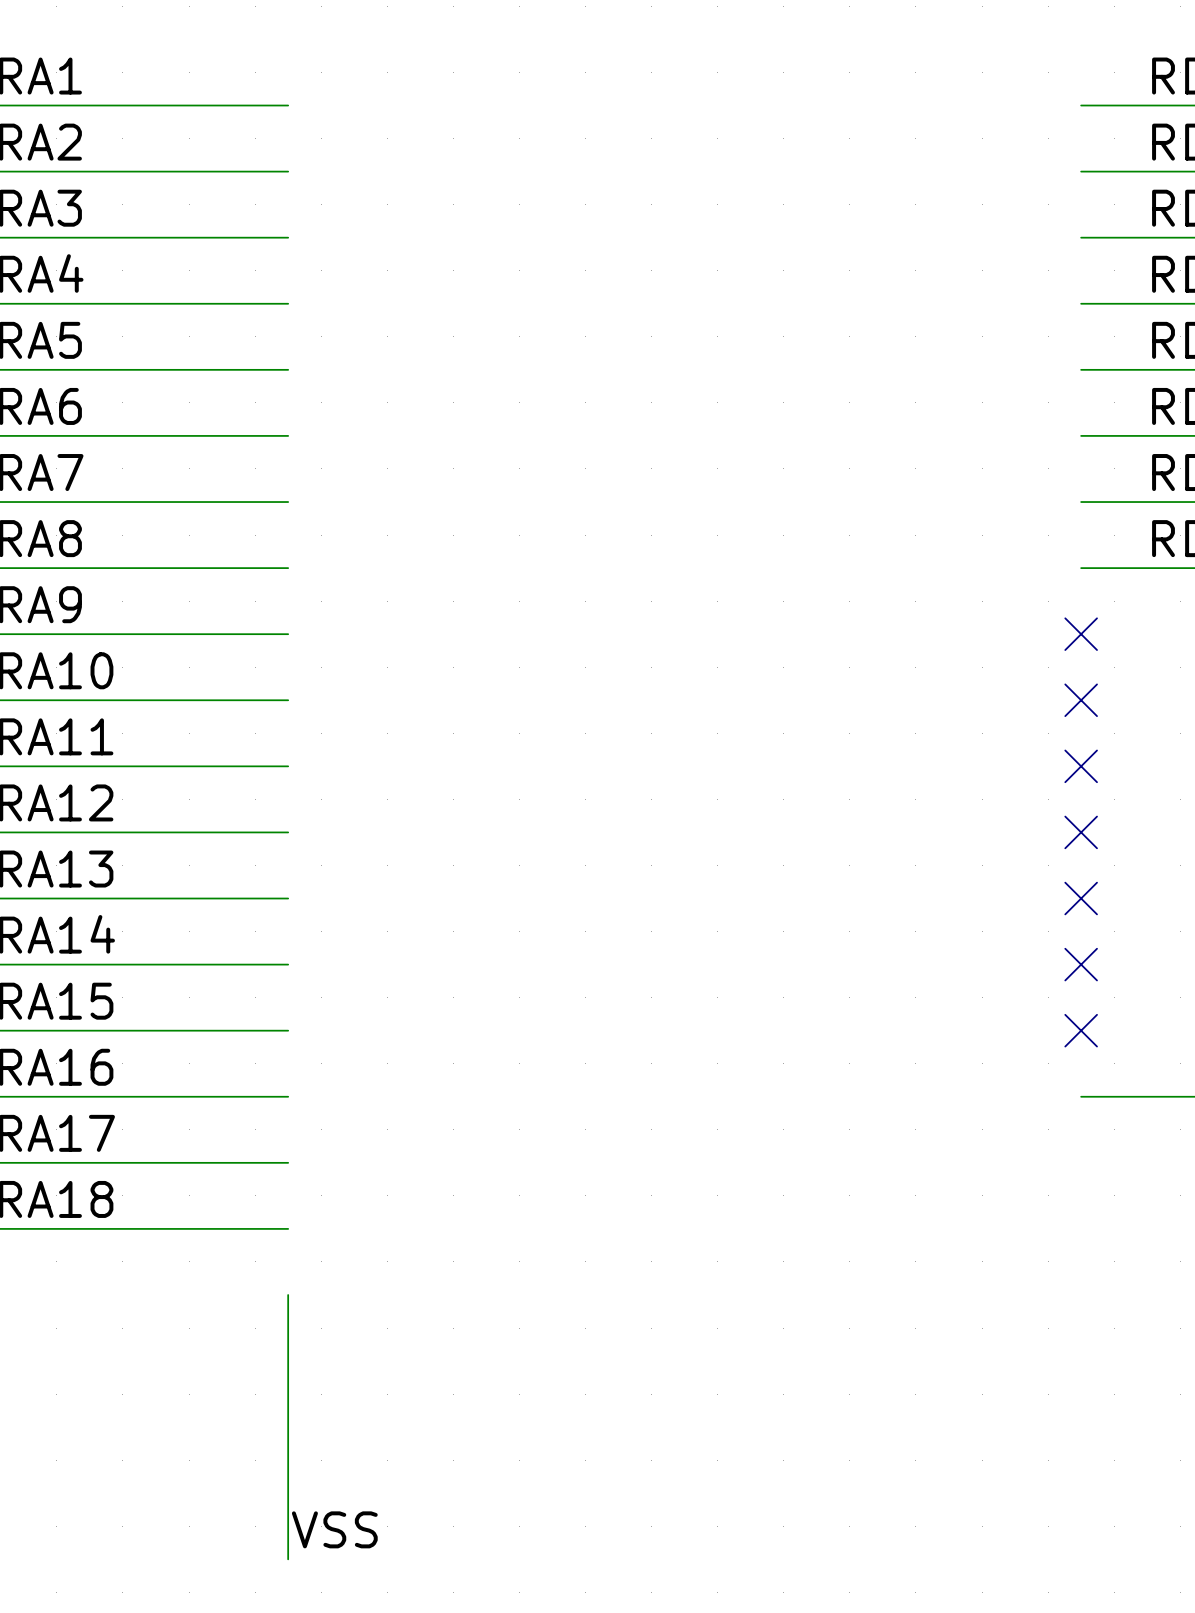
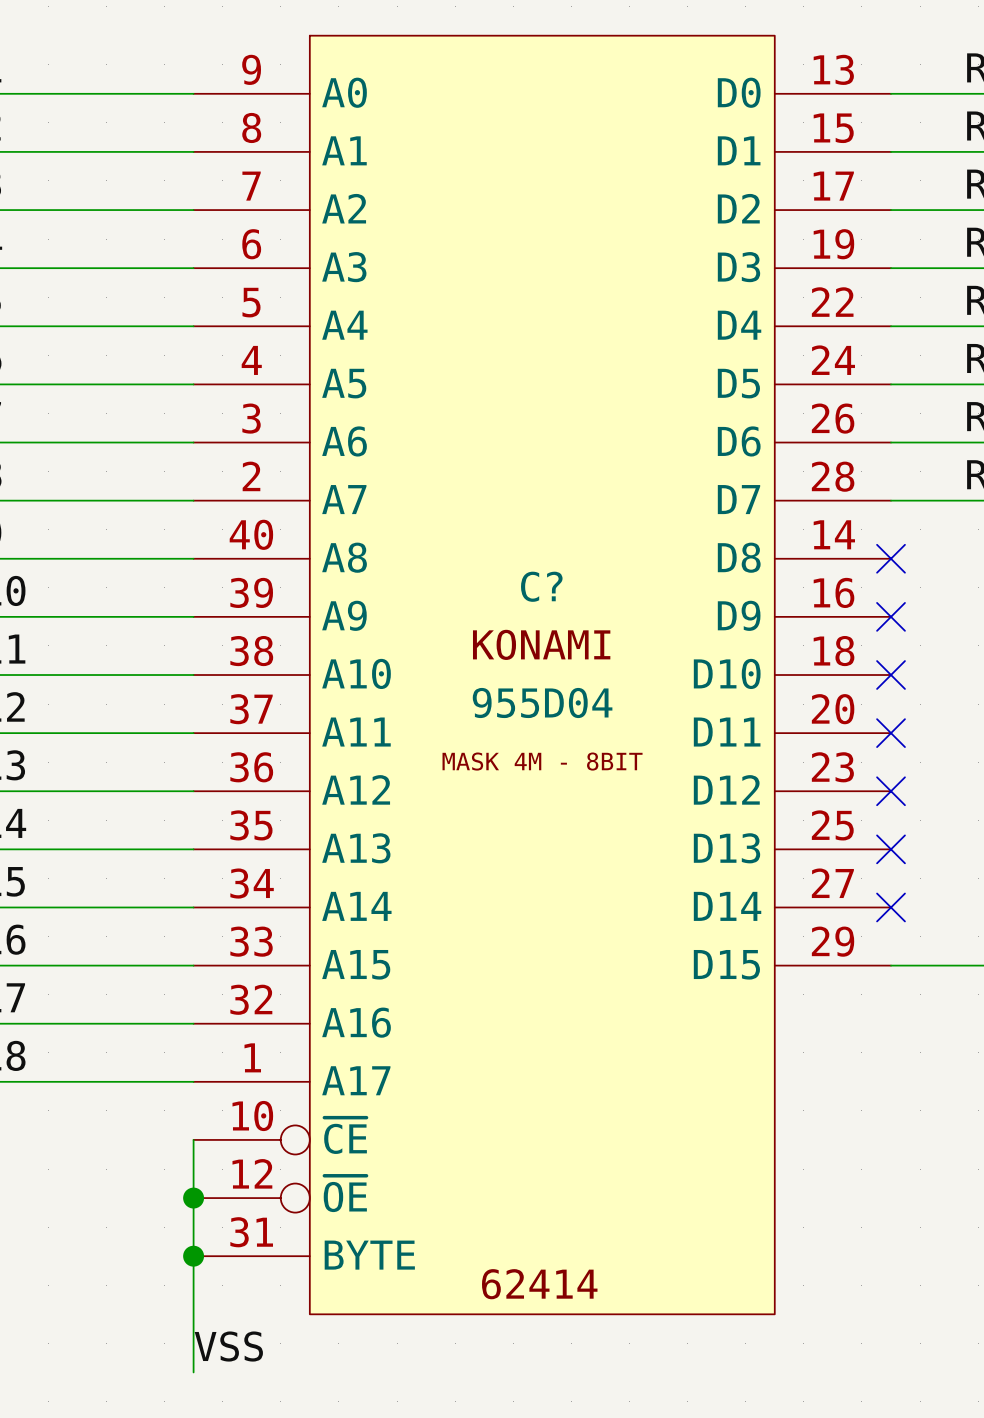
C?: none -> 955D04 (542, 675)
junction: none -> (193, 1198)
junction: none -> (193, 1256)

